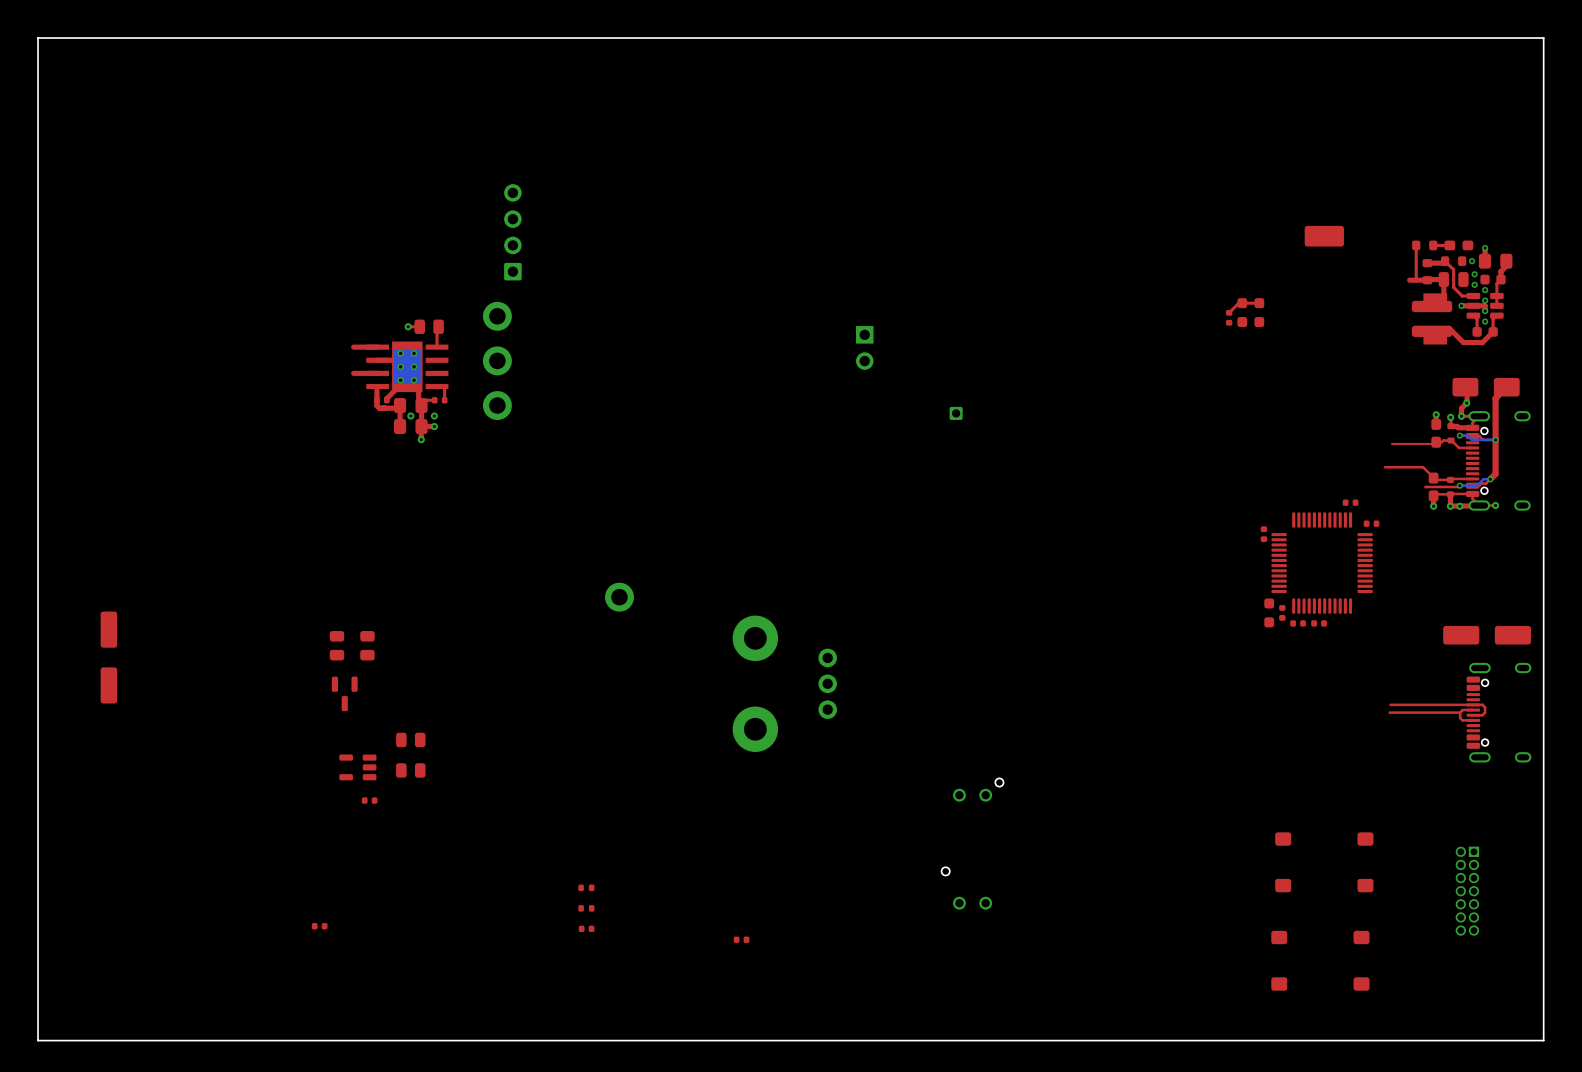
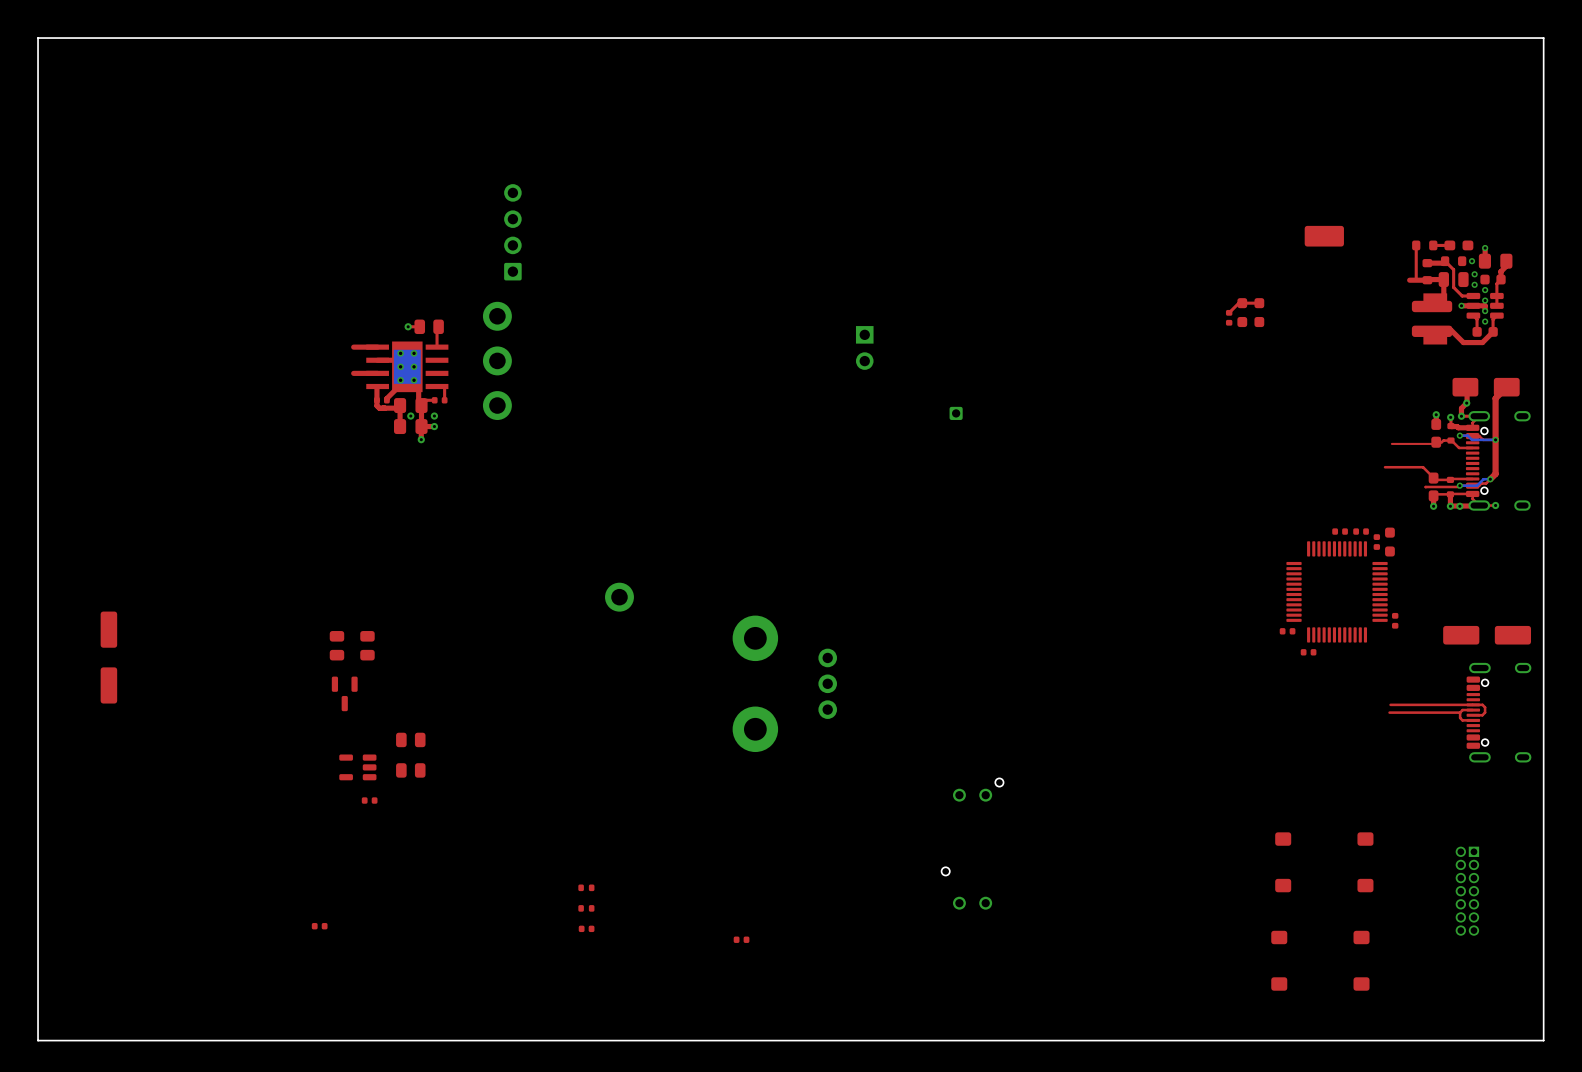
part: (1350, 502) -> none
part: (1371, 523) -> none
part: none -> (1340, 531)
part: none -> (1361, 531)
part: (1263, 534) -> none
part: none -> (1376, 542)
part position: (1322, 563) -> (1337, 591)
part position: (1269, 612) -> (1389, 542)
part: (1282, 612) -> none
part: none -> (1395, 620)
part: (1298, 623) -> none
part: (1319, 623) -> none
part: none -> (1287, 631)
part: none -> (1308, 652)

